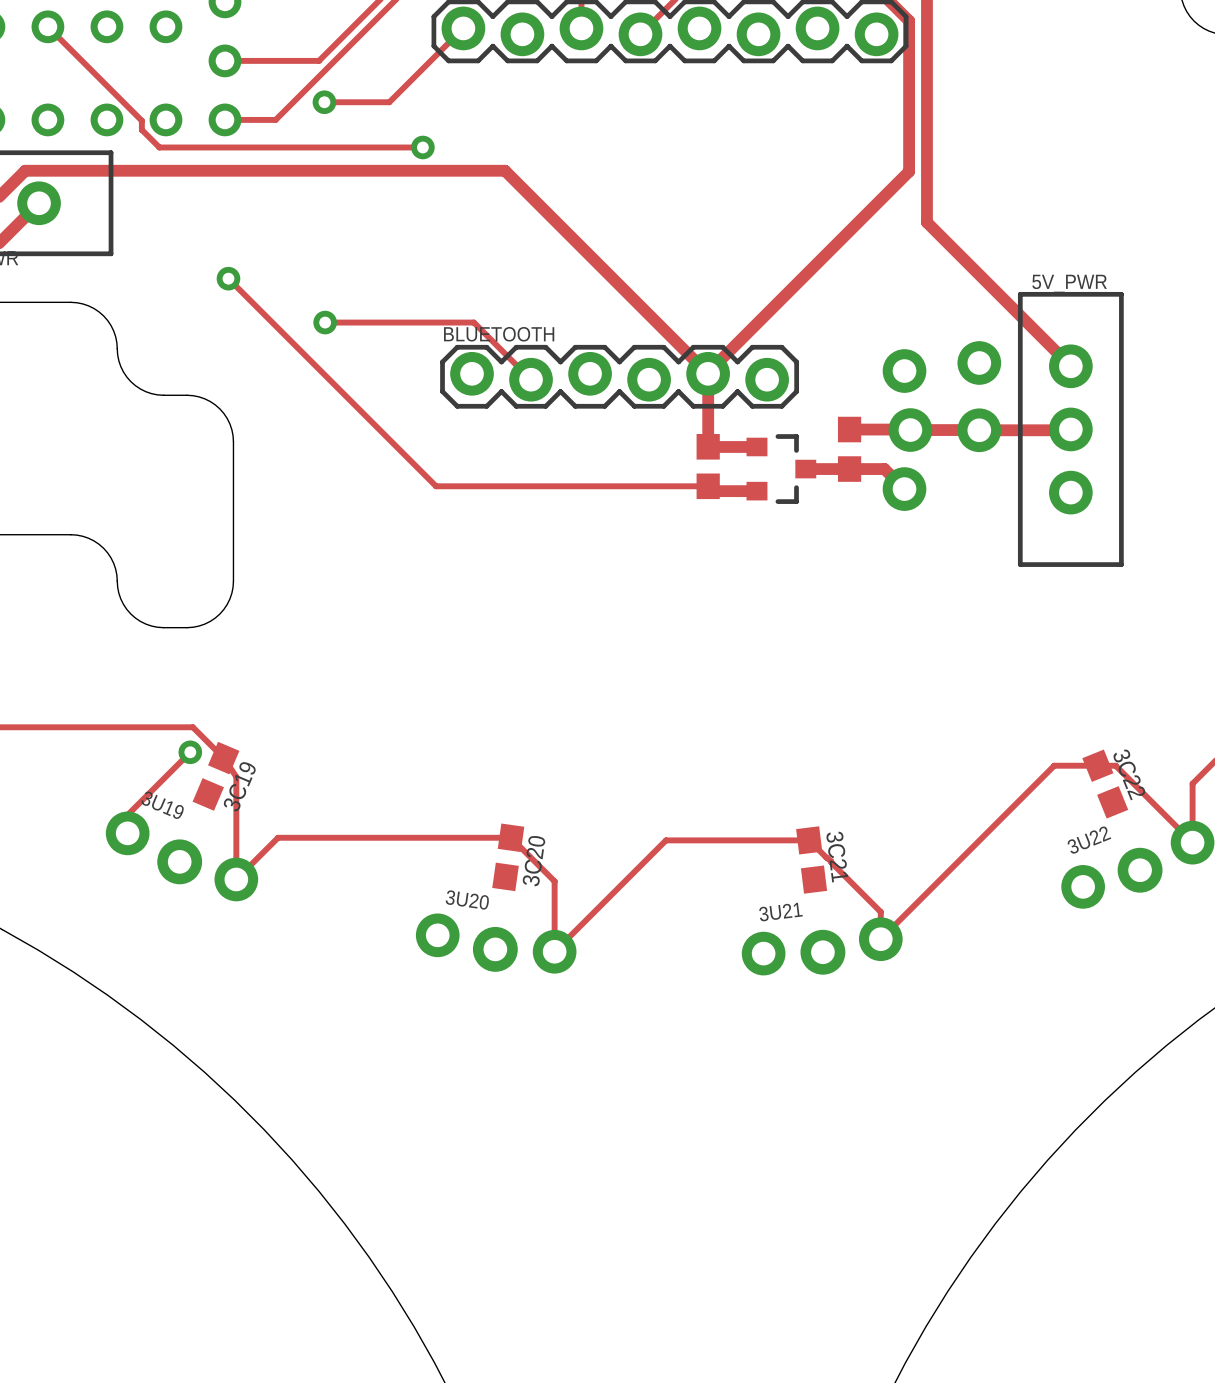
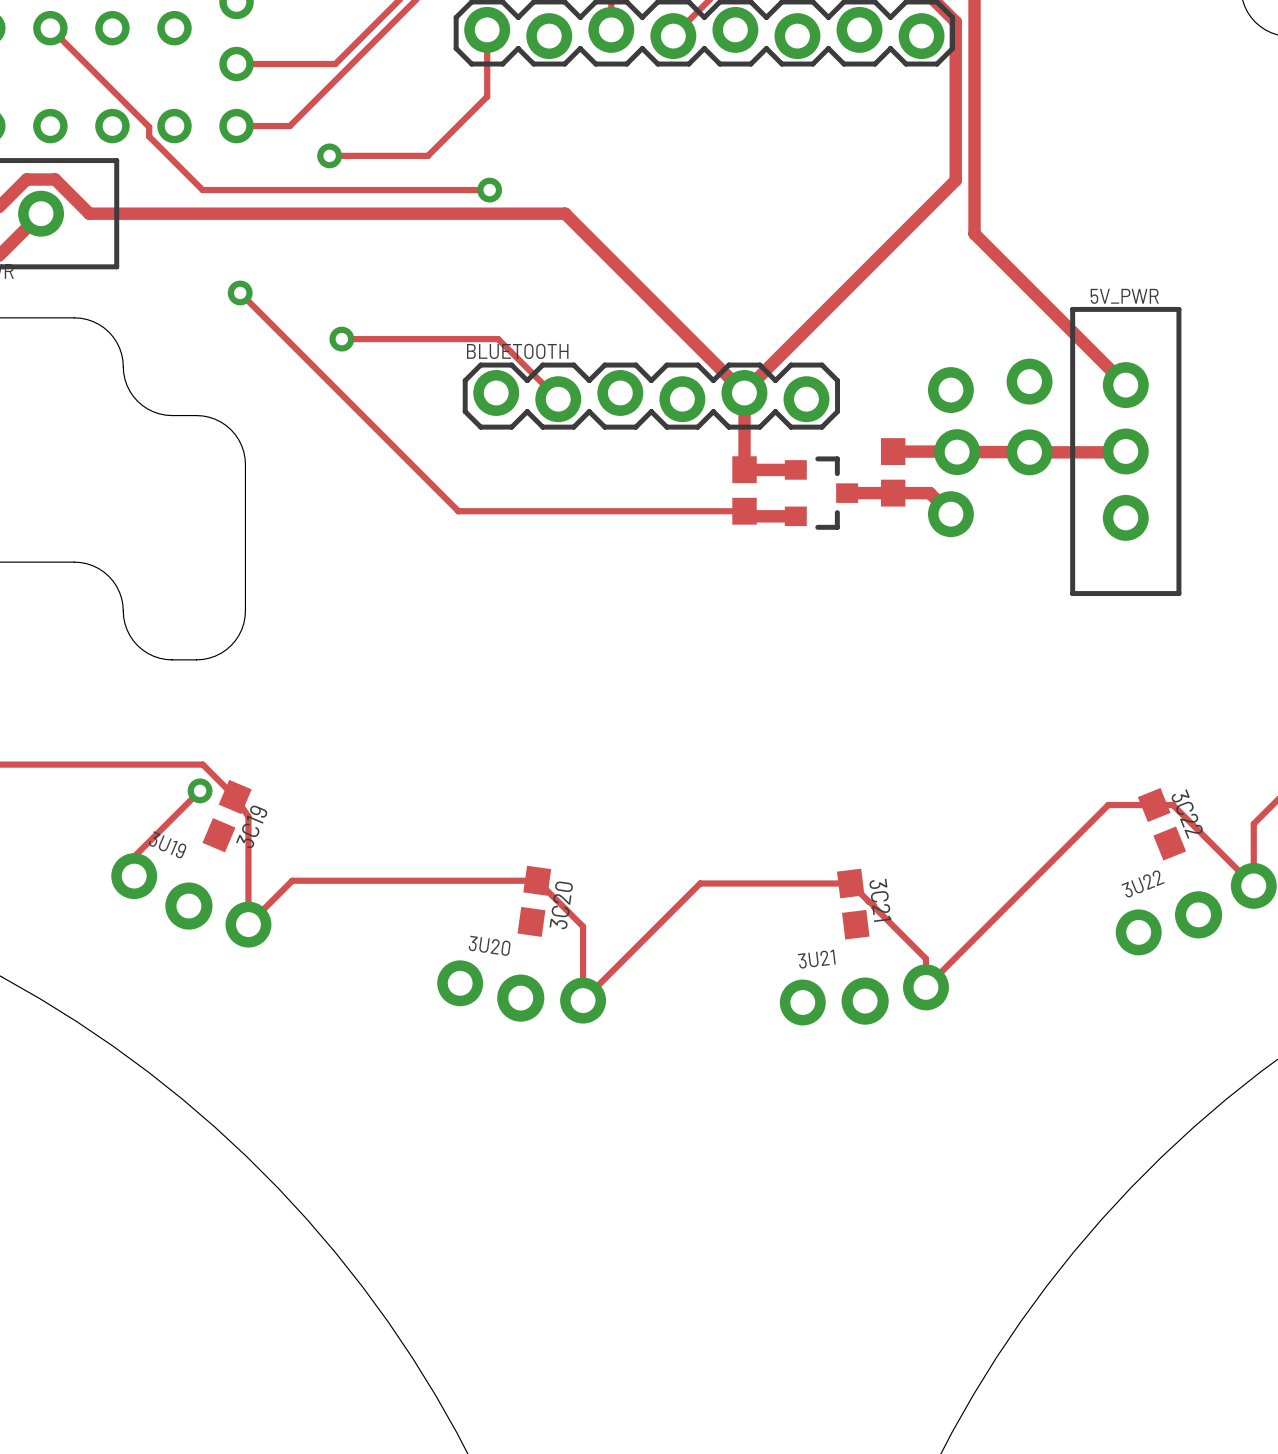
track: (463, 28) (389, 102) (324, 102) -> (487, 29) (487, 96) (427, 155) (329, 155)
via position: (324, 102) -> (329, 155)
track: (159, 147) (422, 147) -> (167, 155) (202, 190) (489, 190)
via position: (422, 147) -> (489, 190)
track: (52, 170) (505, 170) (537, 203) -> (55, 179) (89, 213) (565, 213)

